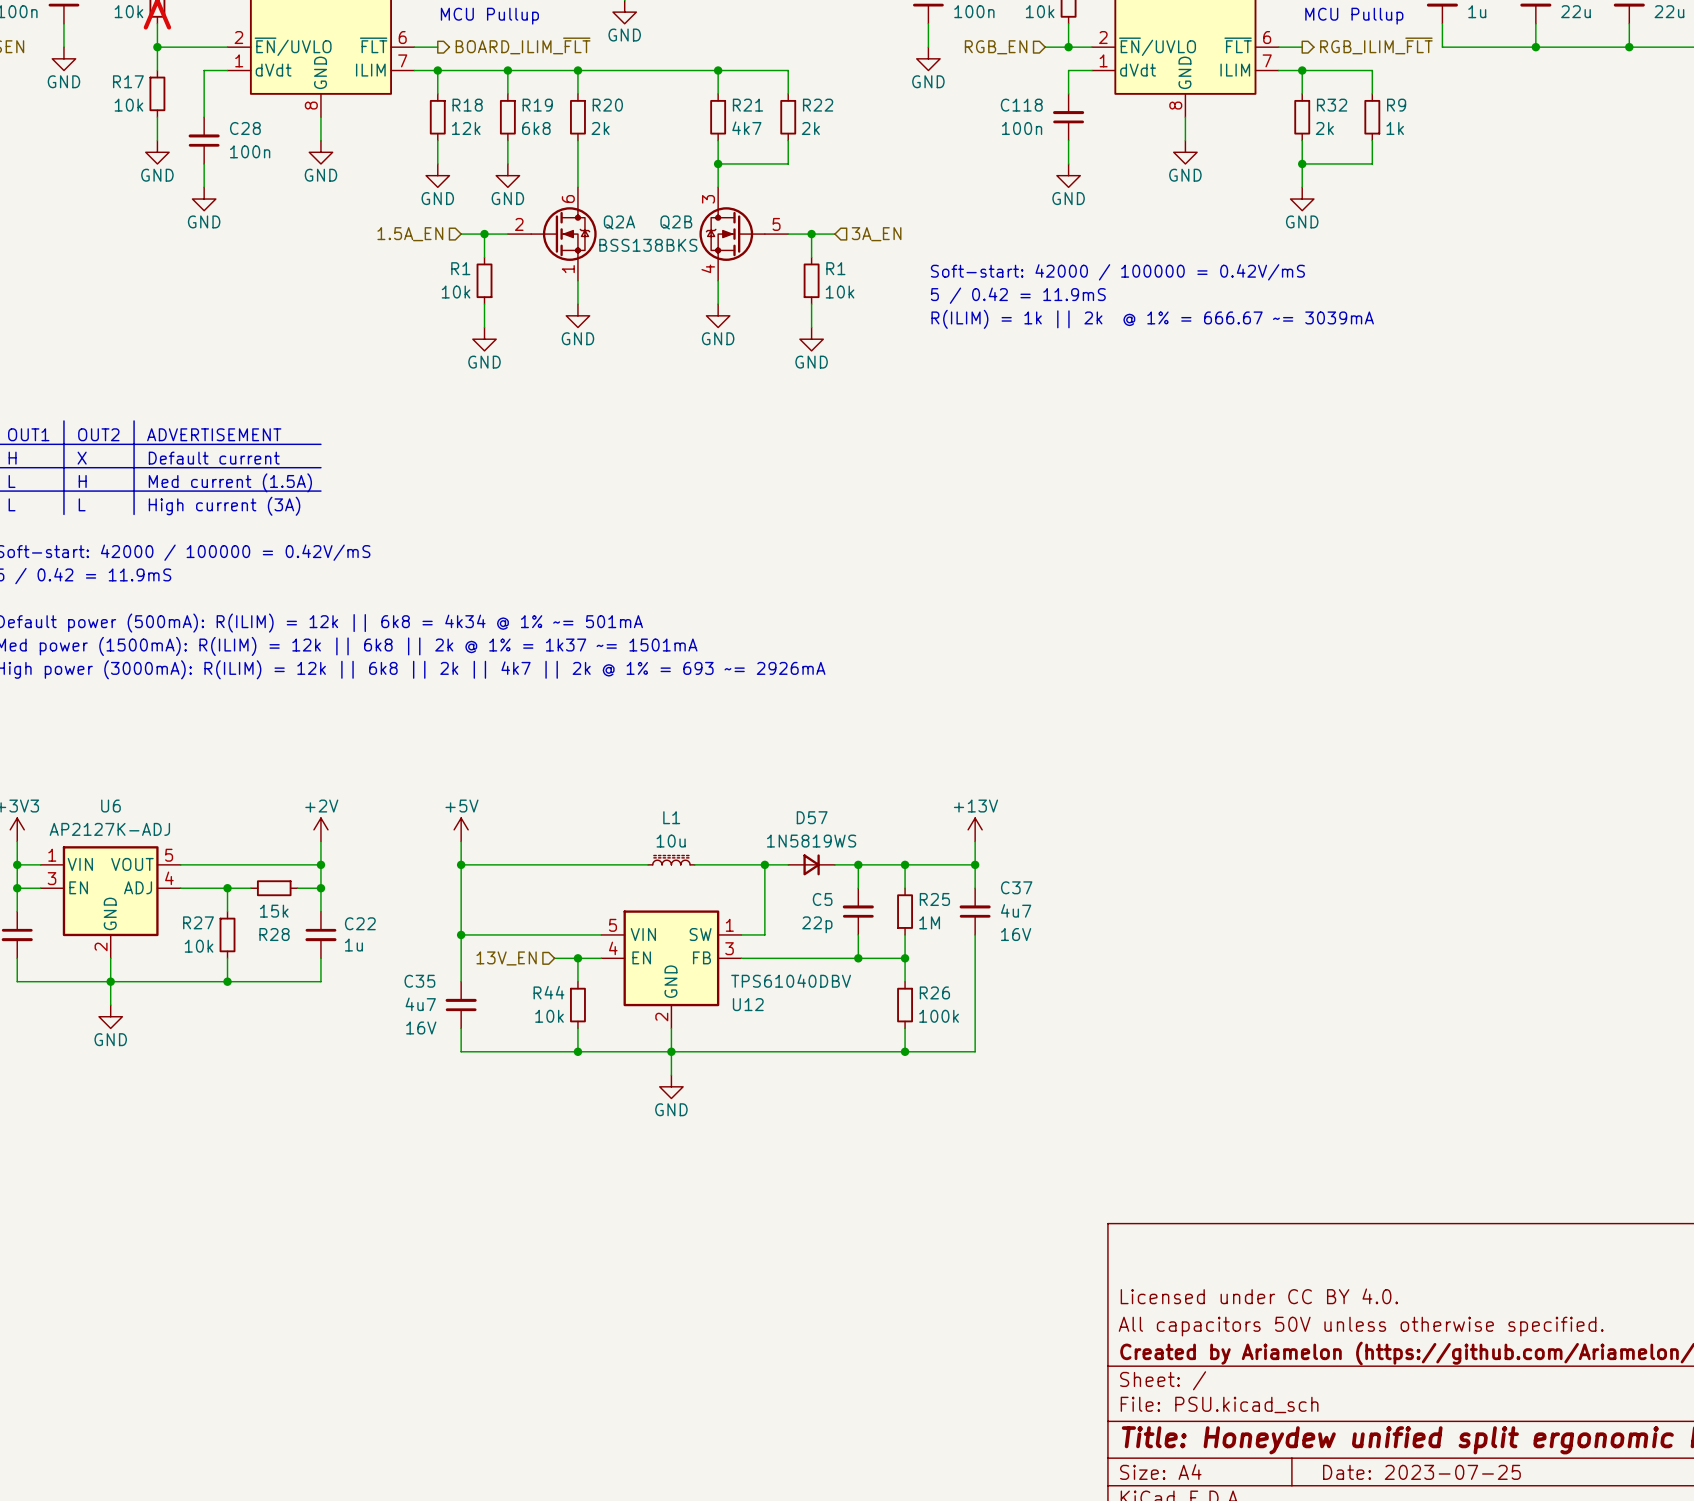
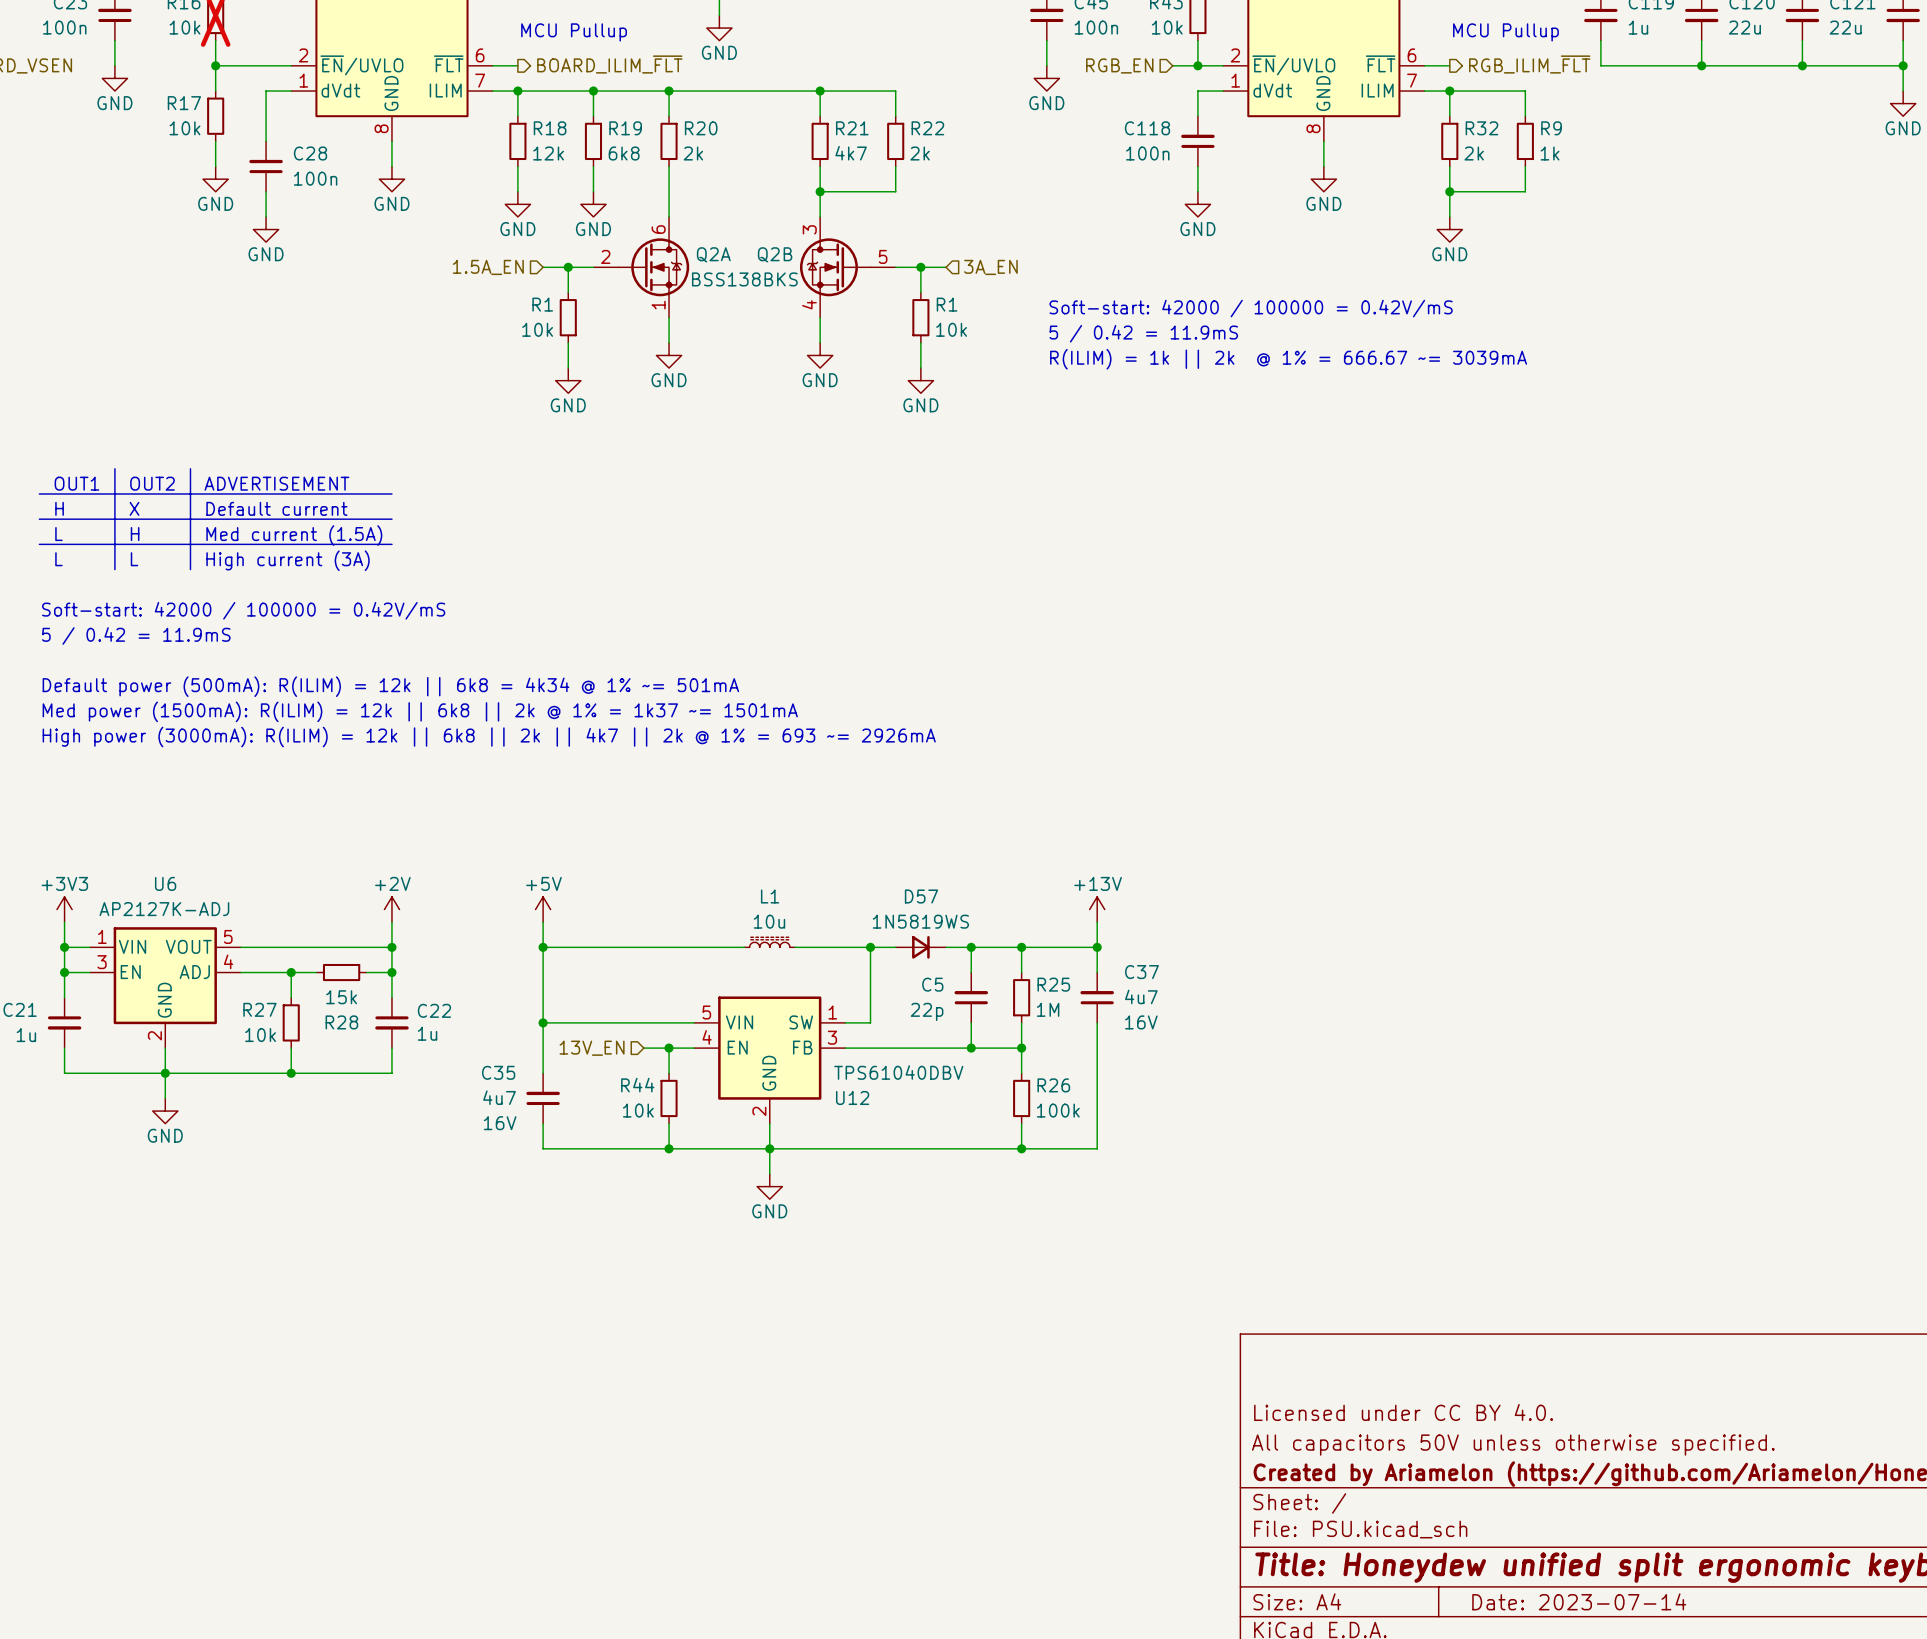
title block: Date: 2023-07-25 (1421, 1472) -> Date: 2023-07-14 (1579, 1601)

